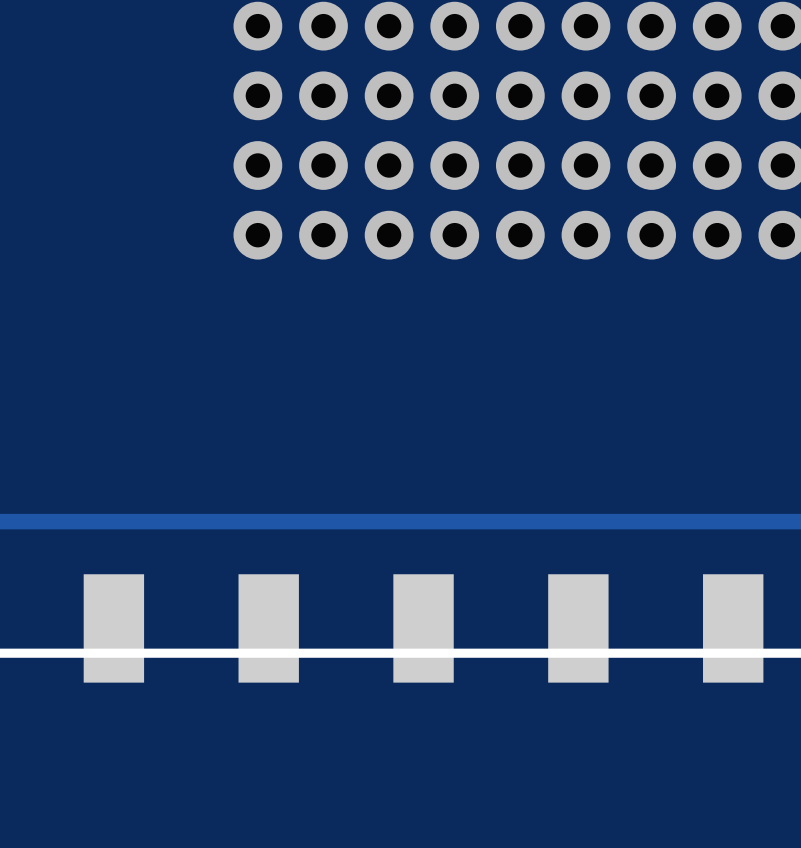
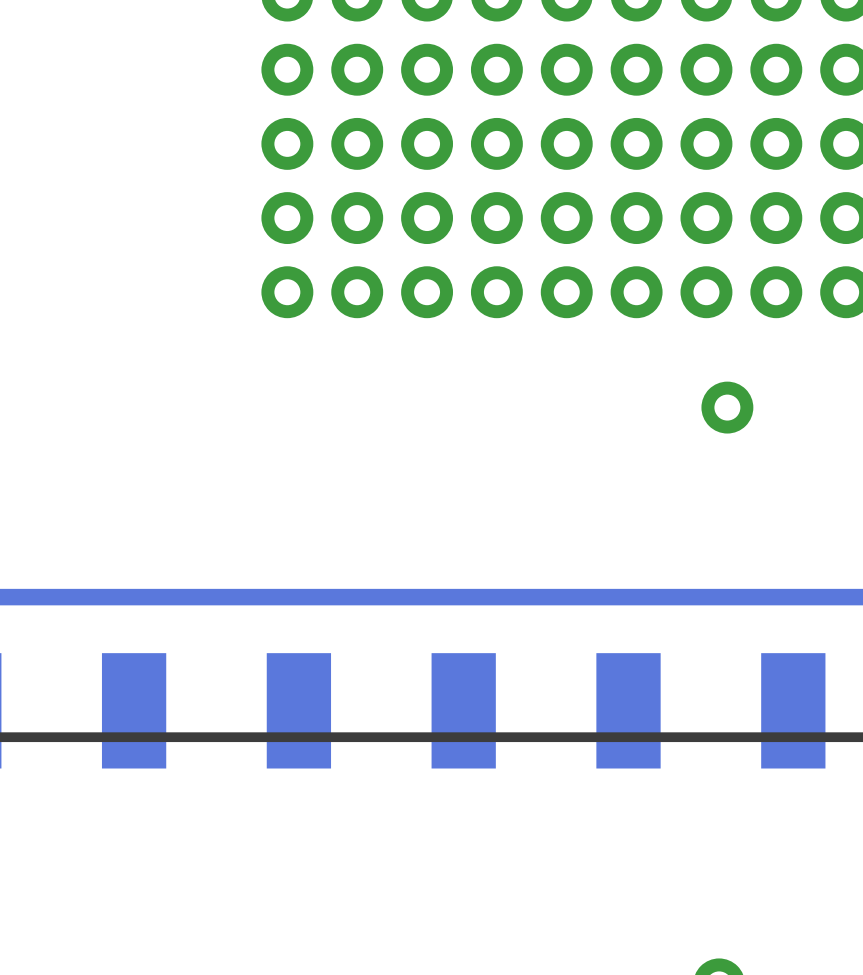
via: none -> (727, 407)

